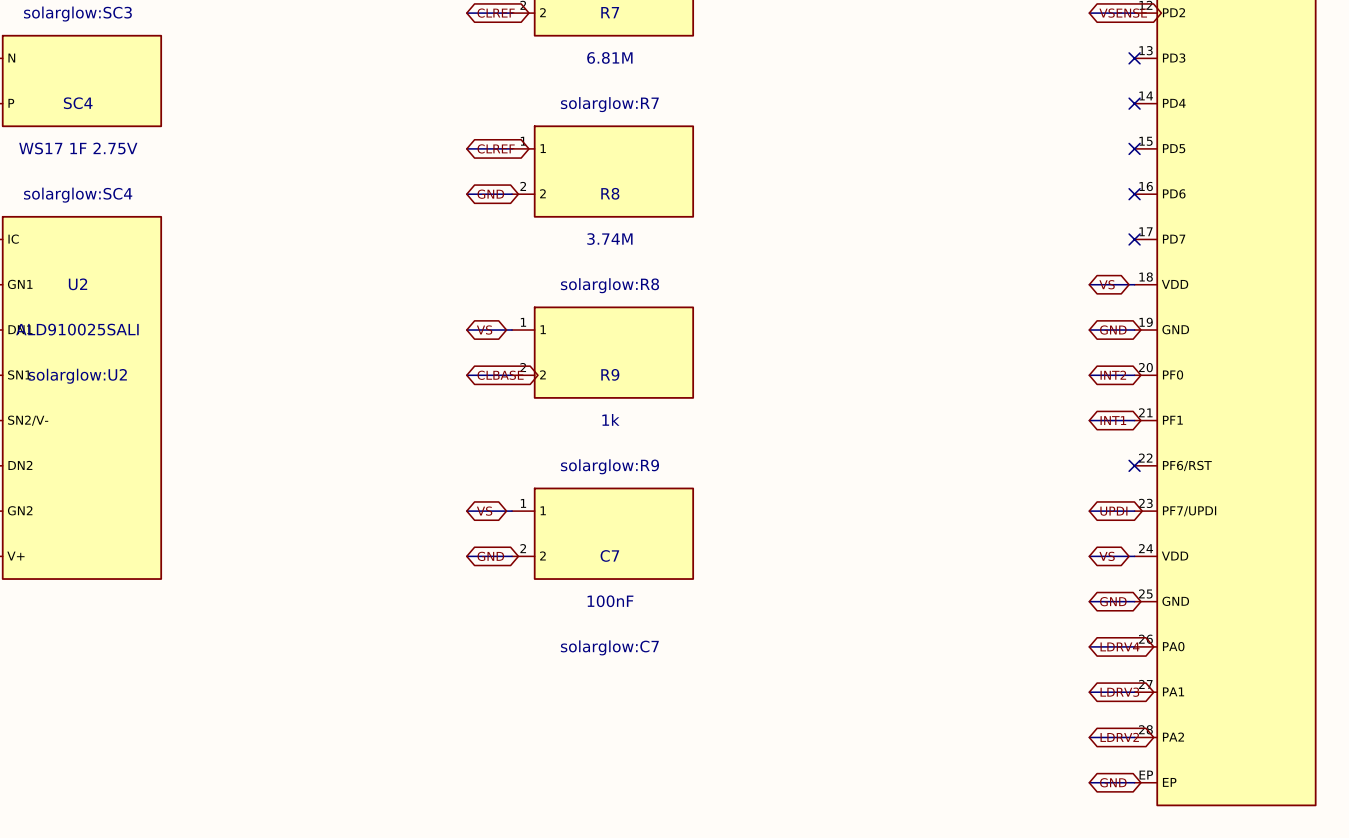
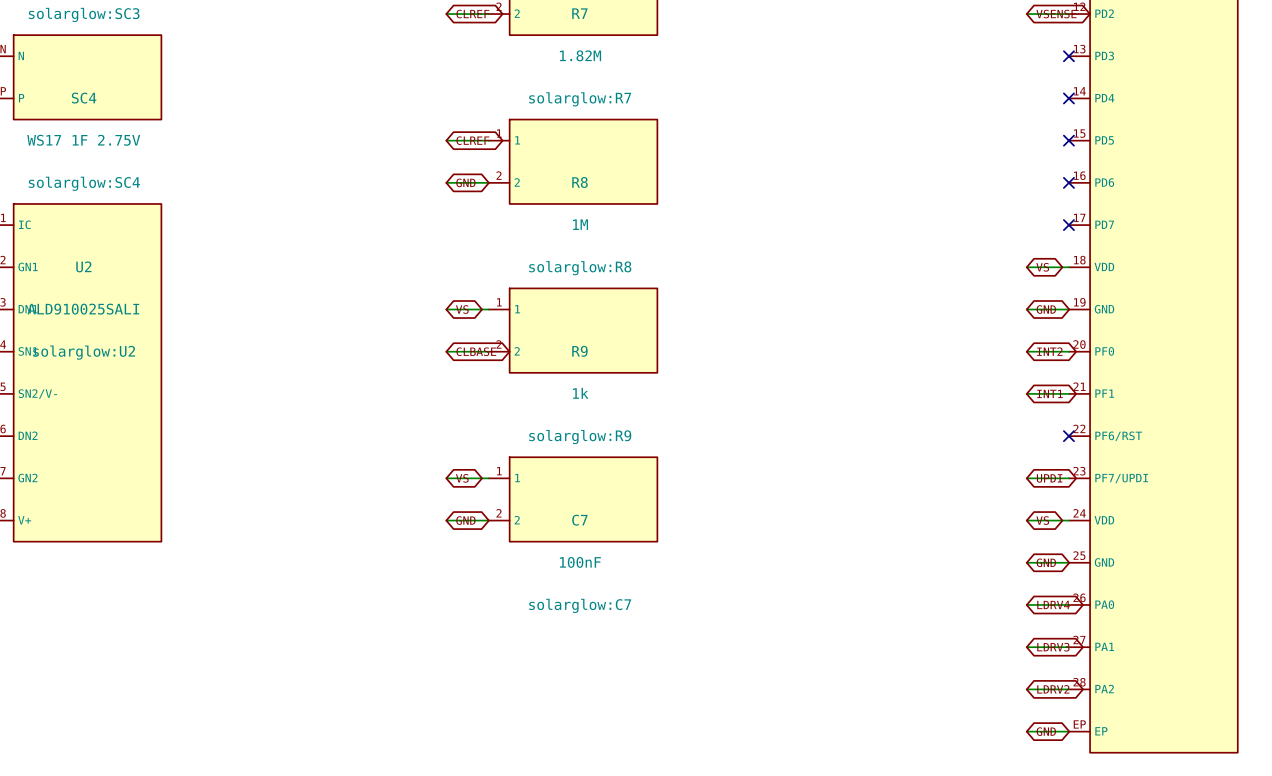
R7 value: 6.81M (609, 57) -> 1.82M (580, 55)
R8 value: 3.74M (609, 239) -> 1M (580, 224)

